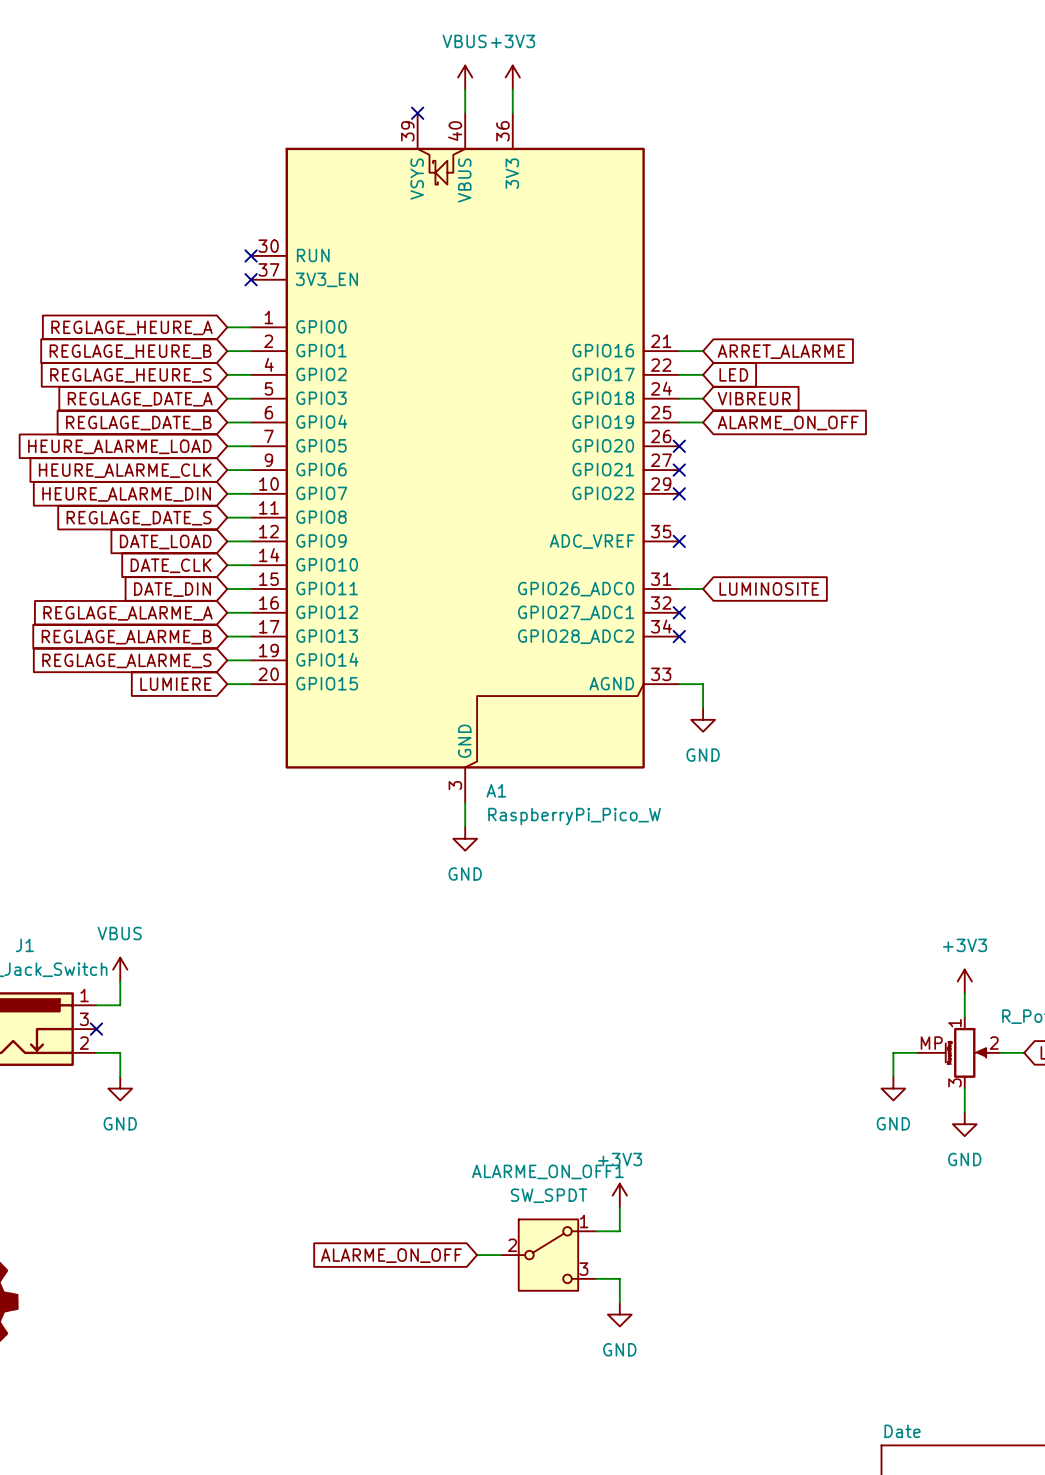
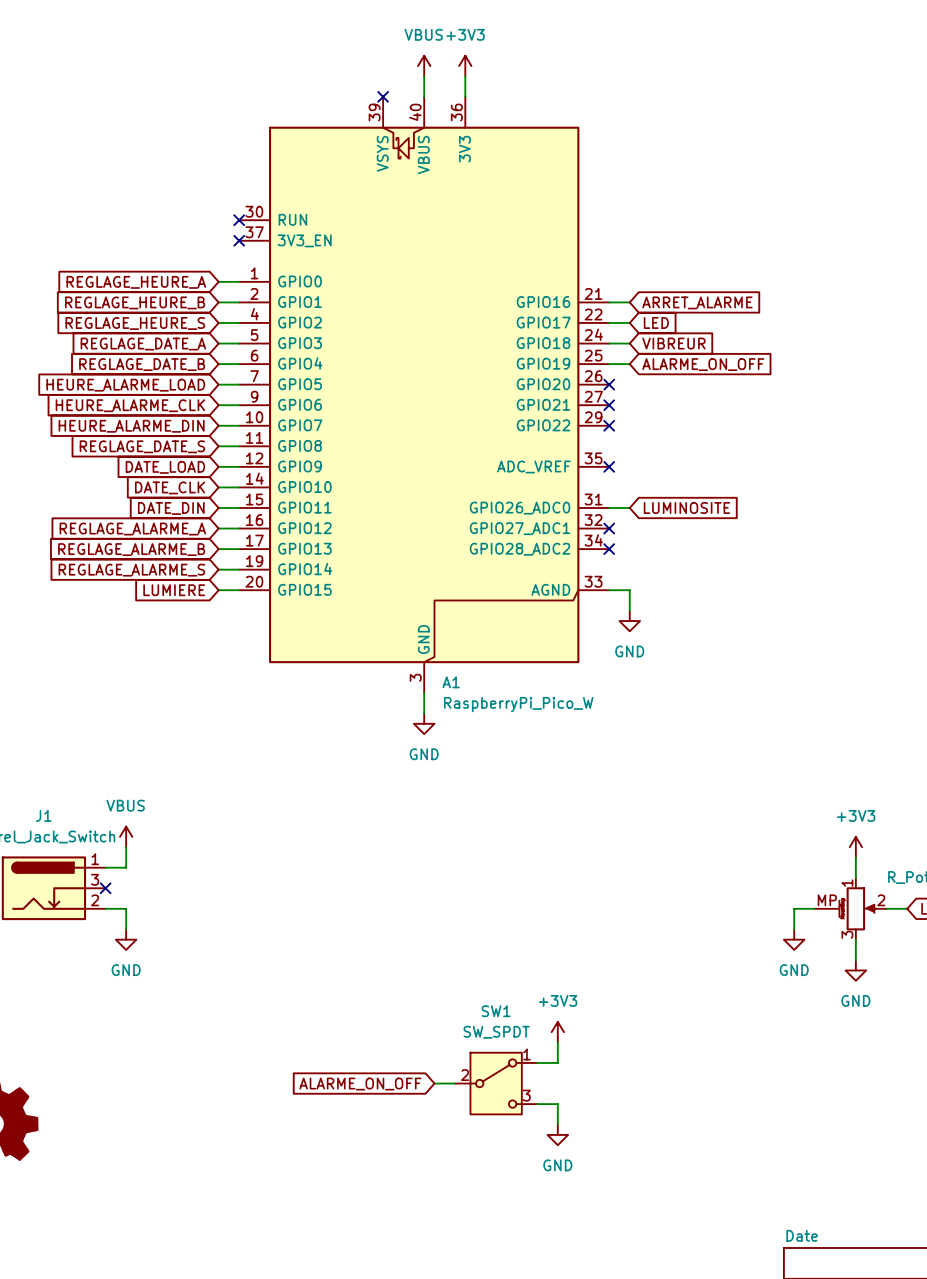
ALARME_ON_OFF1 name: ALARME_ON_OFF1 (547, 1171) -> SW1 (496, 1011)

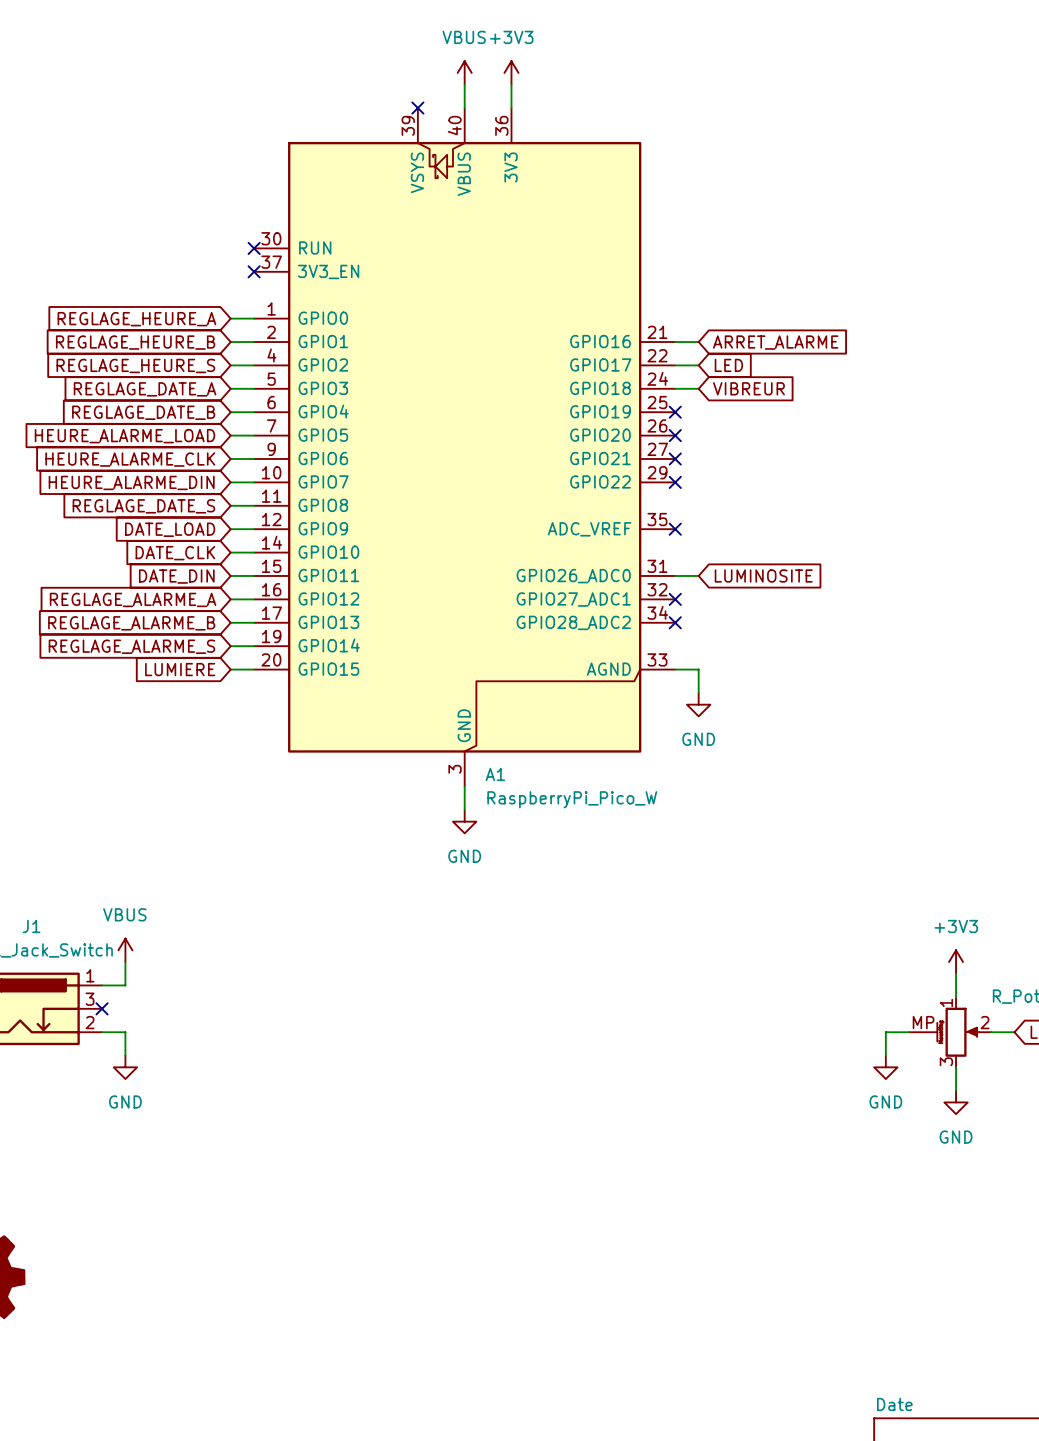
wire: (609, 364) (629, 364) -> none
no-connect mark: none -> (675, 412)
global label: ALARME_ON_OFF (703, 364) -> none
power symbol: +3V3 (557, 1032) -> none
wire: (557, 1042) (557, 1062) (537, 1062) -> none
wire: (434, 1083) (455, 1083) -> none
SW1: SW_SPDT (496, 1083) -> none
global label: ALARME_ON_OFF (360, 1084) -> none
wire: (537, 1104) (557, 1104) (557, 1124) -> none
power symbol: GND (557, 1134) -> none

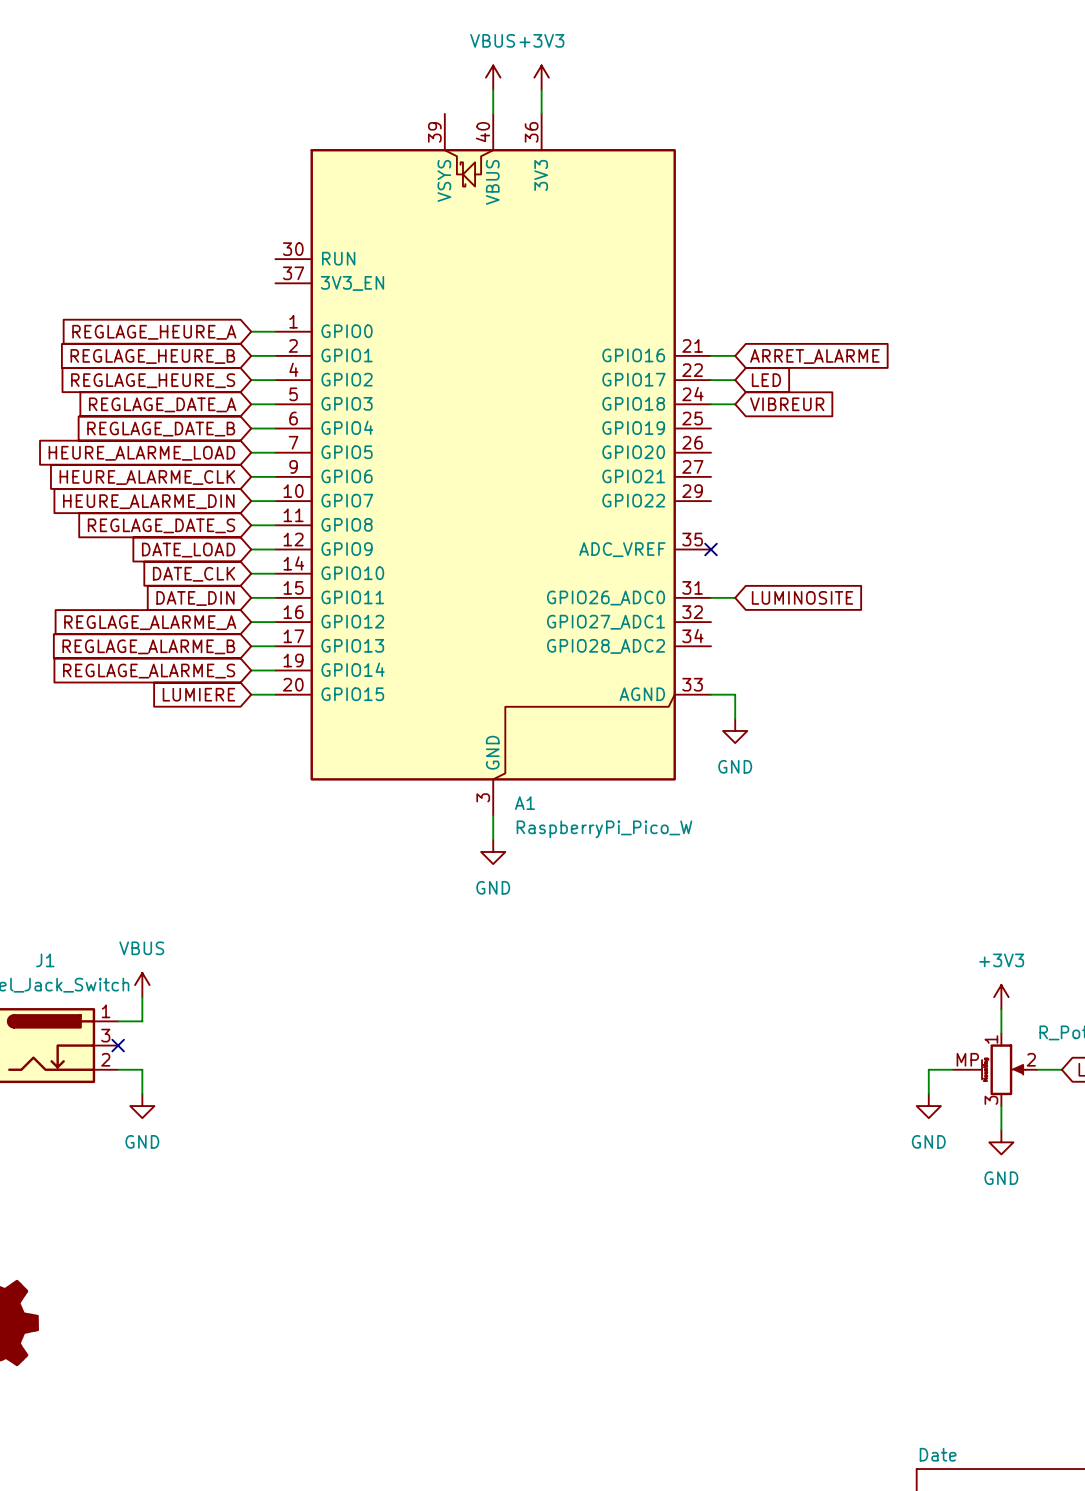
no-connect mark: (417, 108) -> none
no-connect mark: (254, 248) -> none
no-connect mark: (254, 271) -> none
no-connect mark: (675, 412) -> none
no-connect mark: (675, 435) -> none
no-connect mark: (675, 459) -> none
no-connect mark: (675, 482) -> none
no-connect mark: (675, 599) -> none
no-connect mark: (675, 622) -> none

